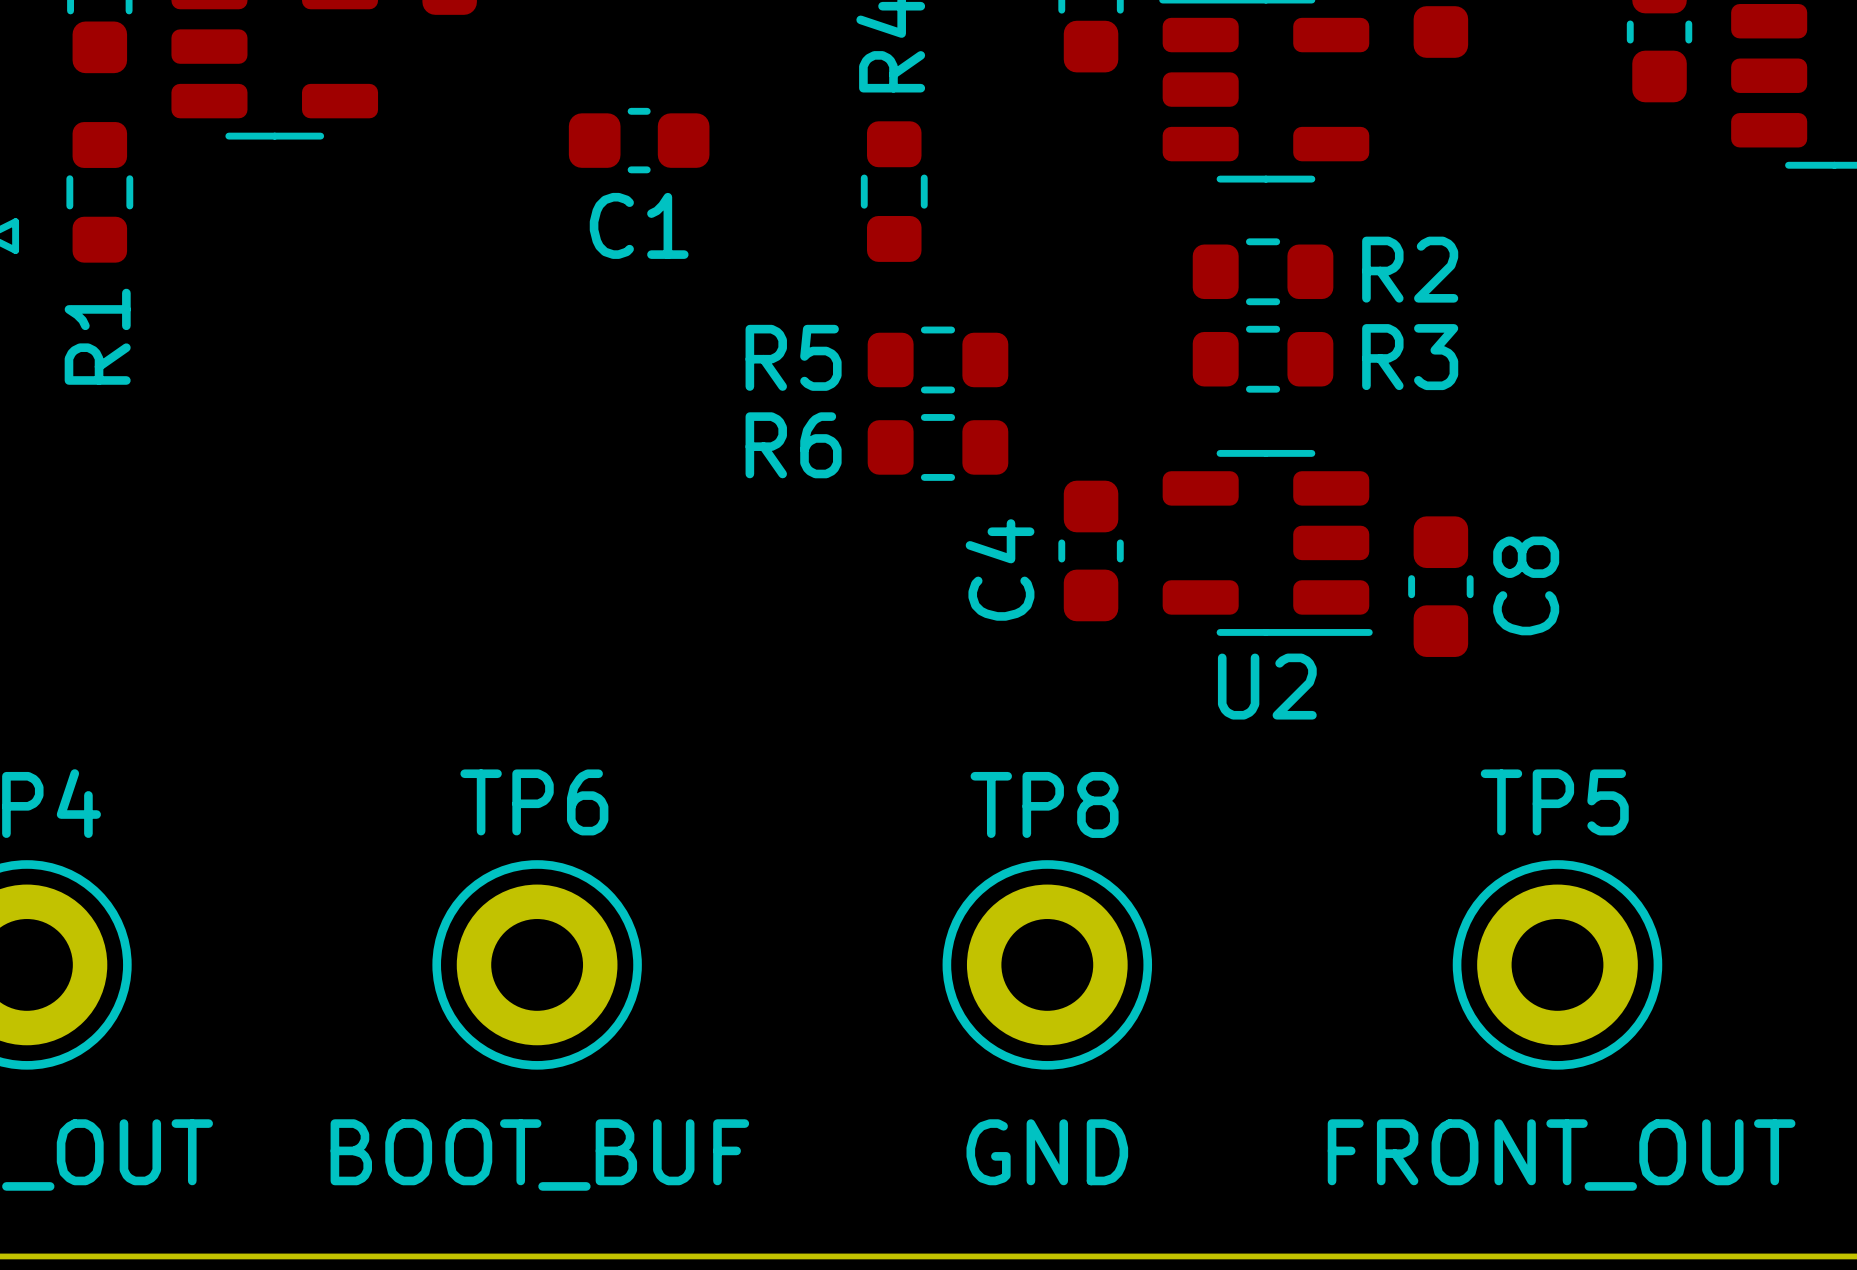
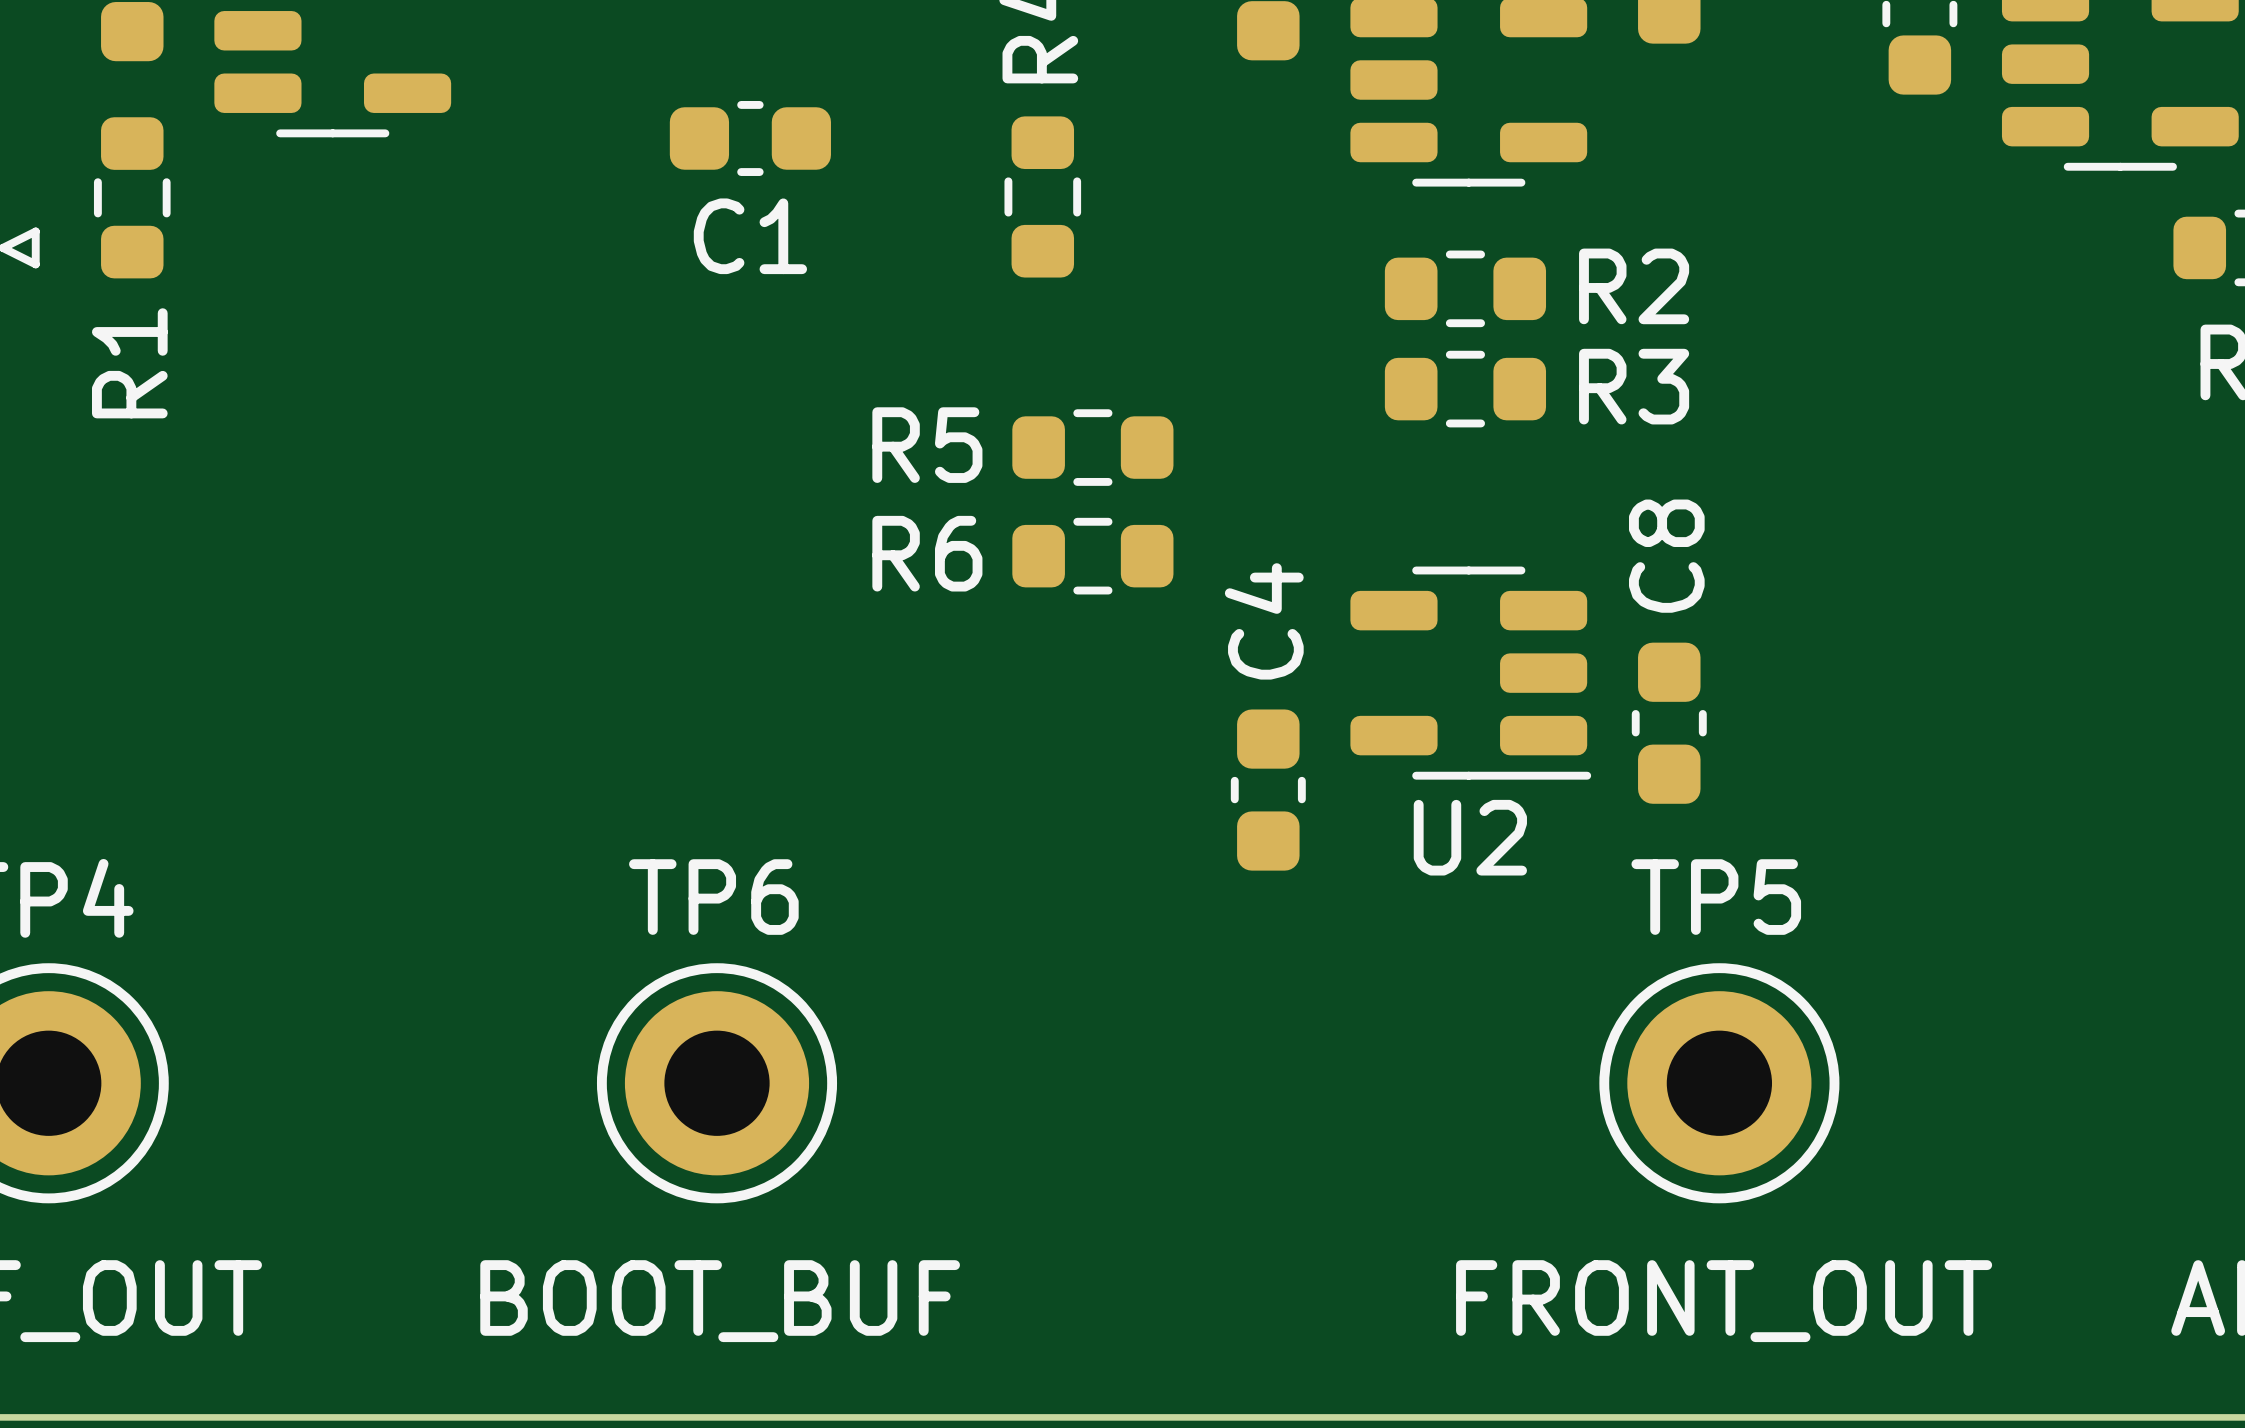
R5 position: (937, 359) -> (1092, 447)
R6 position: (937, 447) -> (1092, 556)
U2 position: (1267, 542) -> (1470, 673)
C4 position: (1091, 550) -> (1268, 790)
C4 name position: C4 (1000, 569) -> C4 (1264, 621)
C8 name position: C8 (1526, 585) -> C8 (1666, 556)
C8 position: (1440, 586) -> (1669, 723)
TP6 position: (537, 964) -> (717, 1083)
TP8: (1047, 964) -> none
TP5 position: (1557, 964) -> (1719, 1083)
text: GND (1047, 1152) -> none
text position: BOOT_BUF (539, 1155) -> BOOT_BUF (720, 1301)
text position: FRONT_OUT (1561, 1155) -> FRONT_OUT (1724, 1301)

